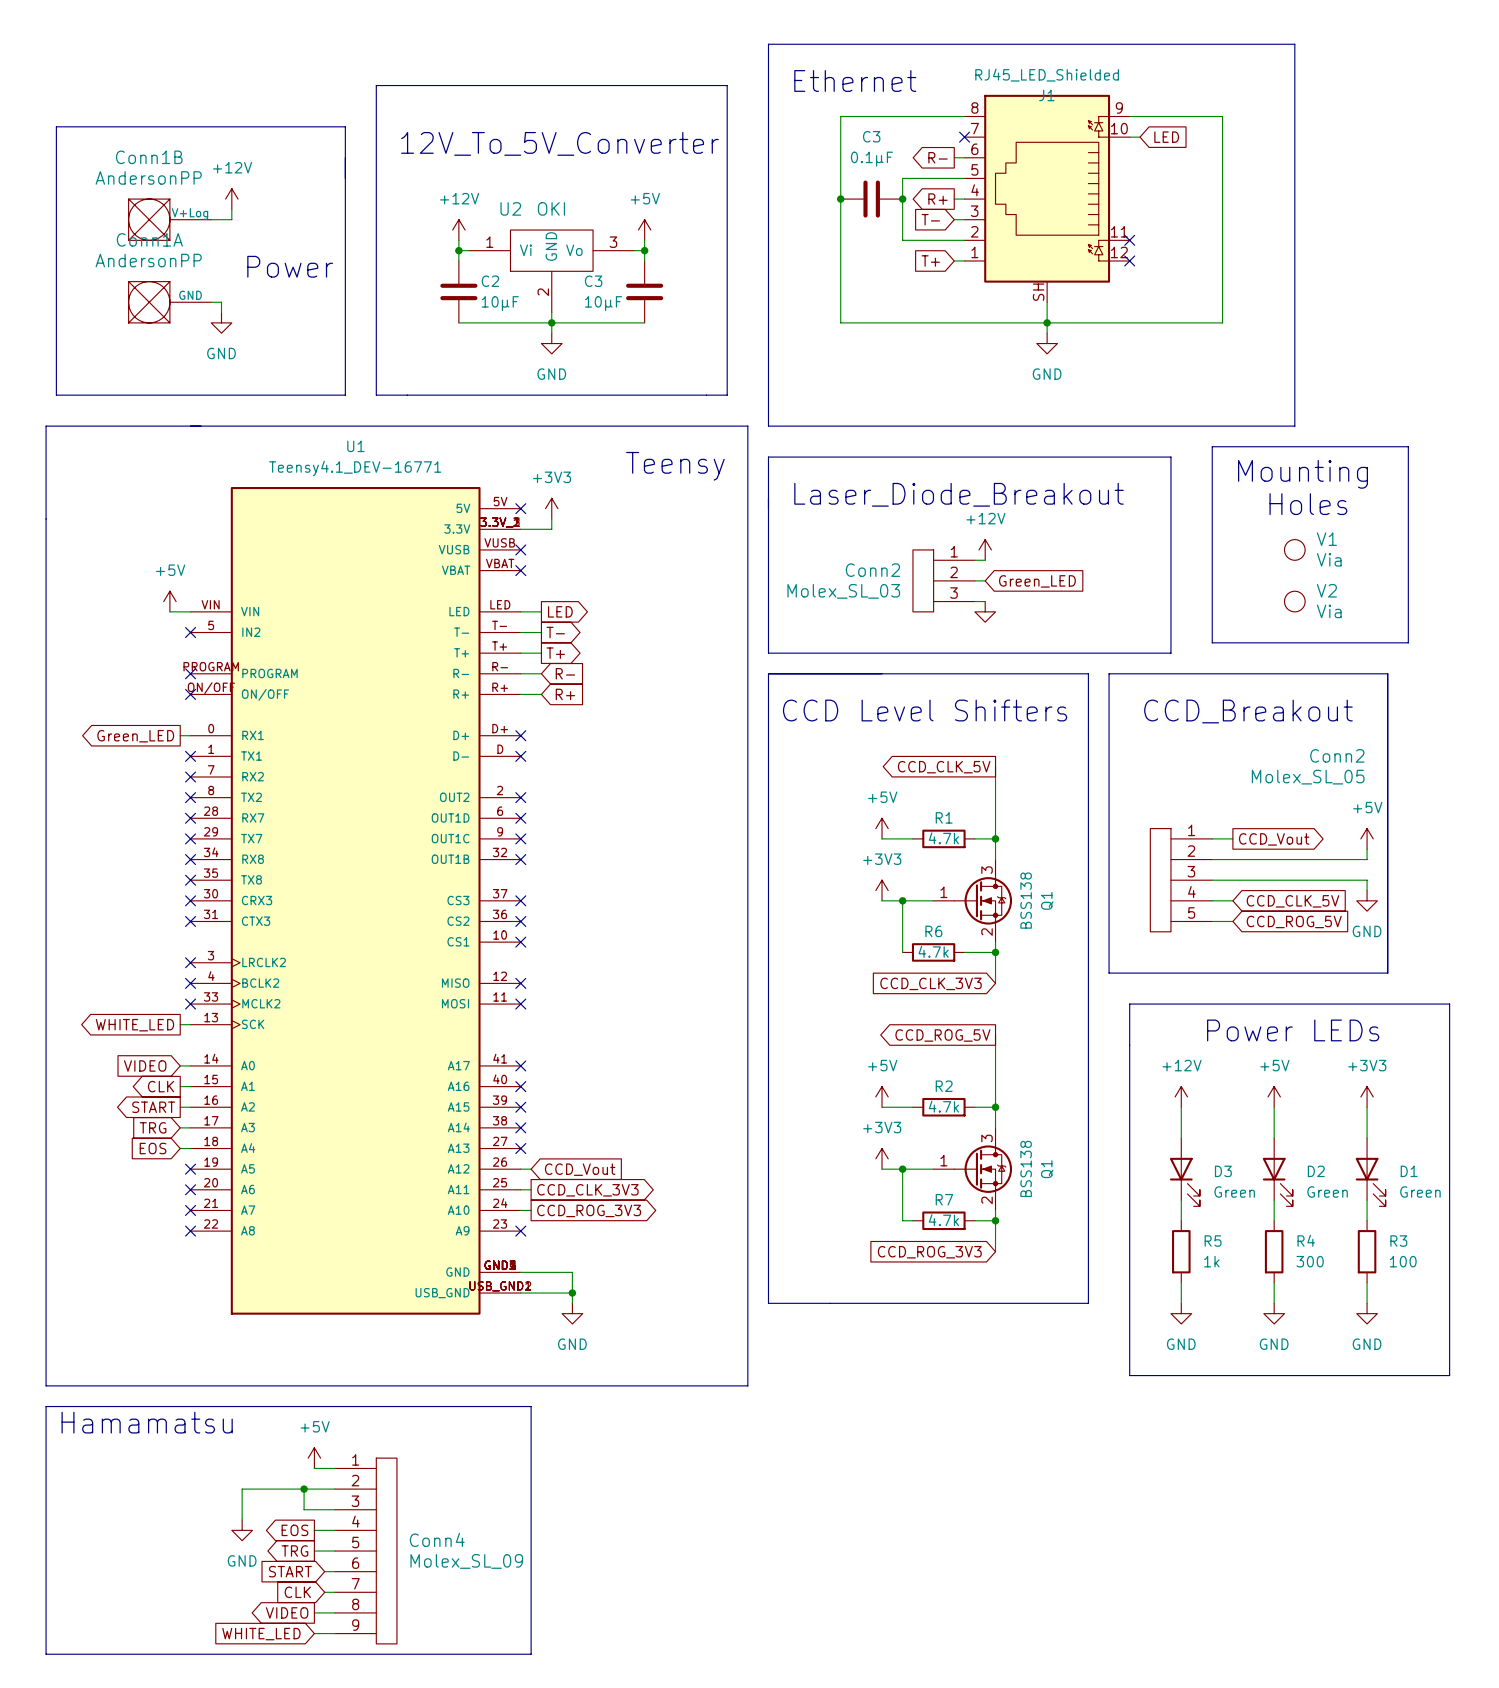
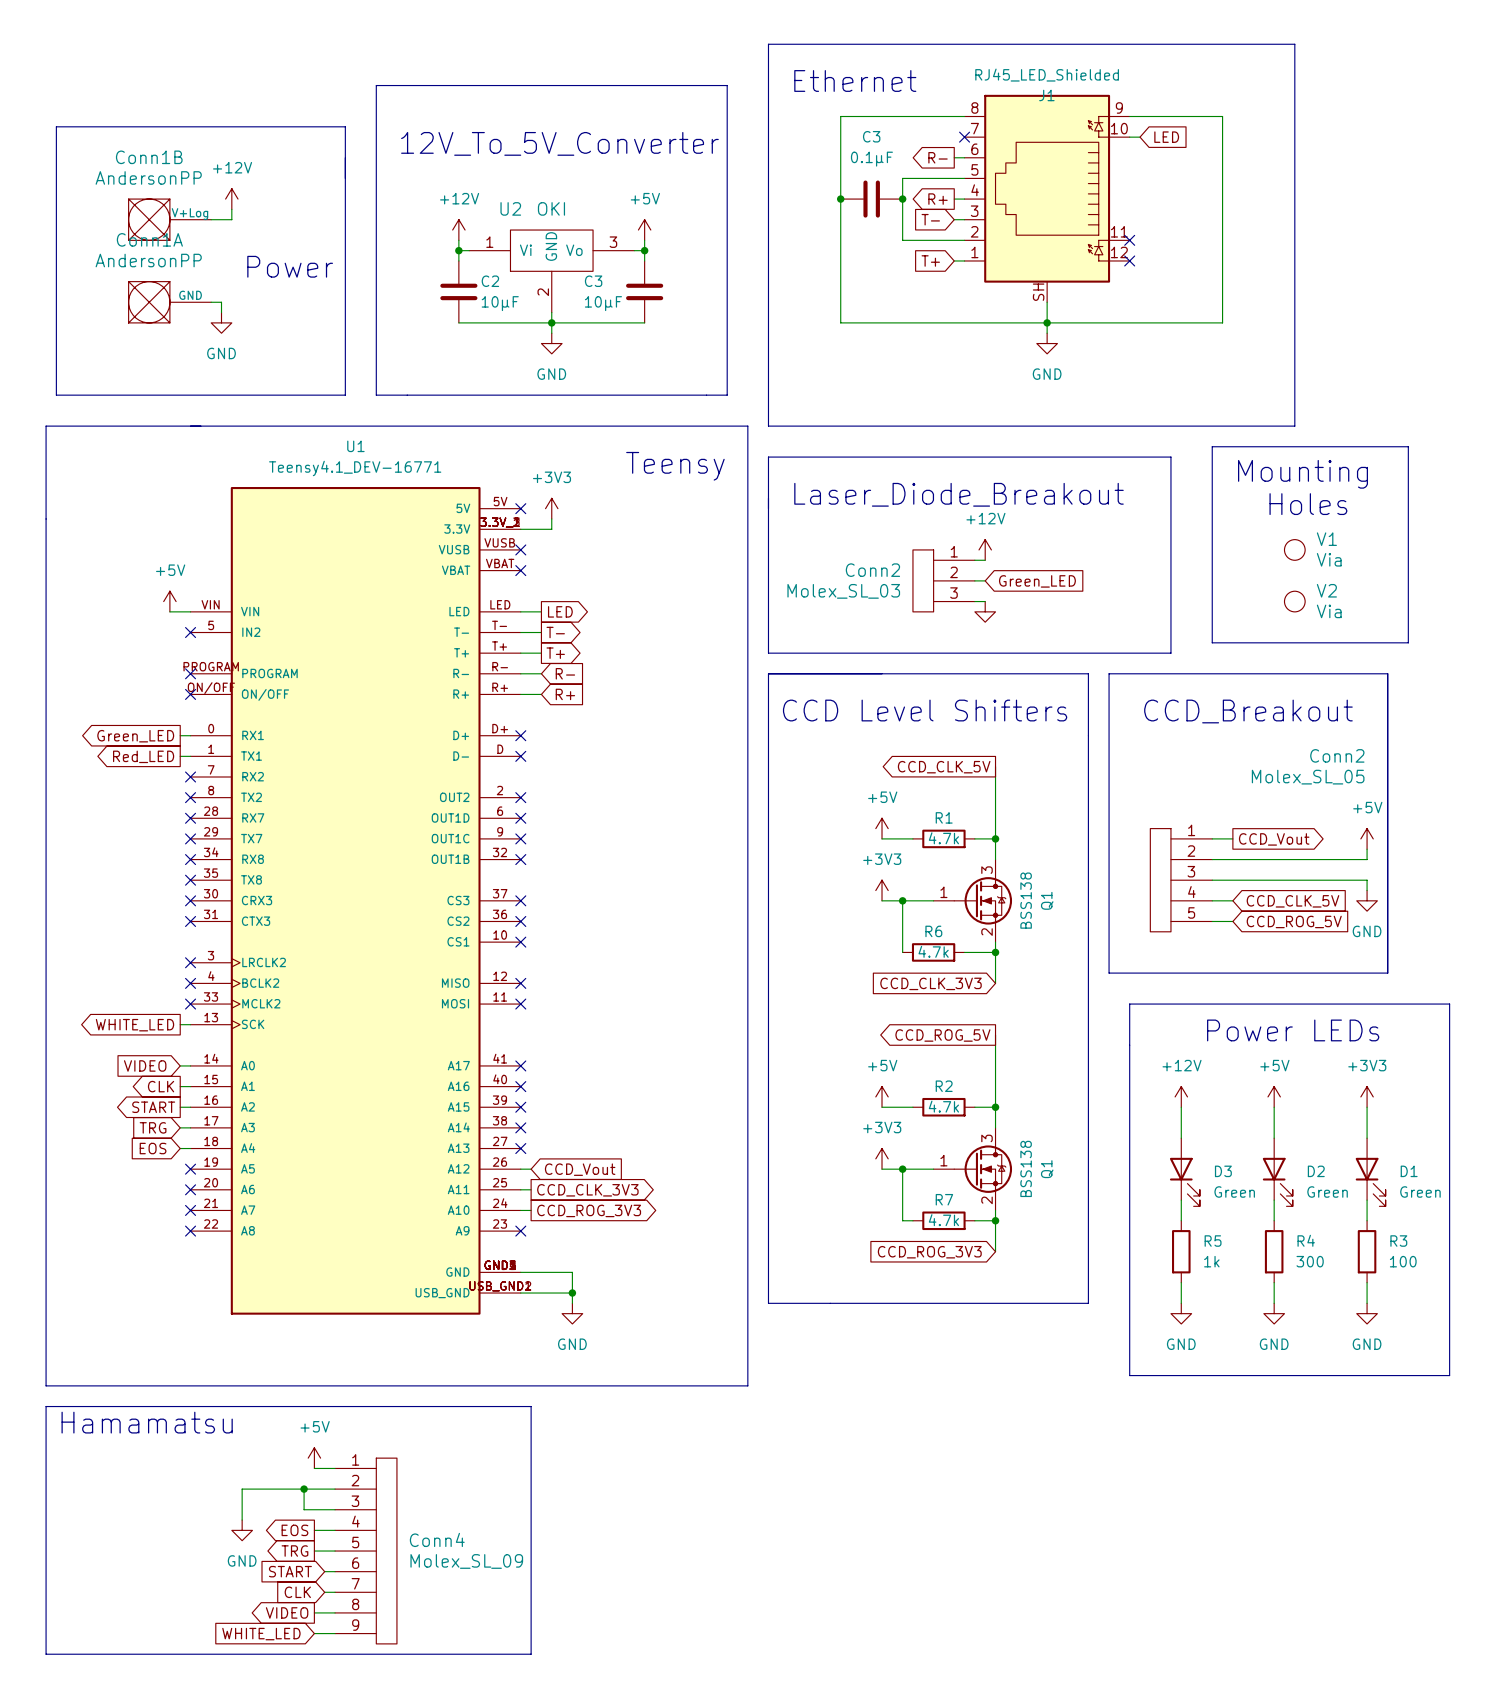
global label: none -> Red_LED (143, 756)
wire: none -> (180, 756) (190, 756)
no-connect mark: (190, 756) -> none

